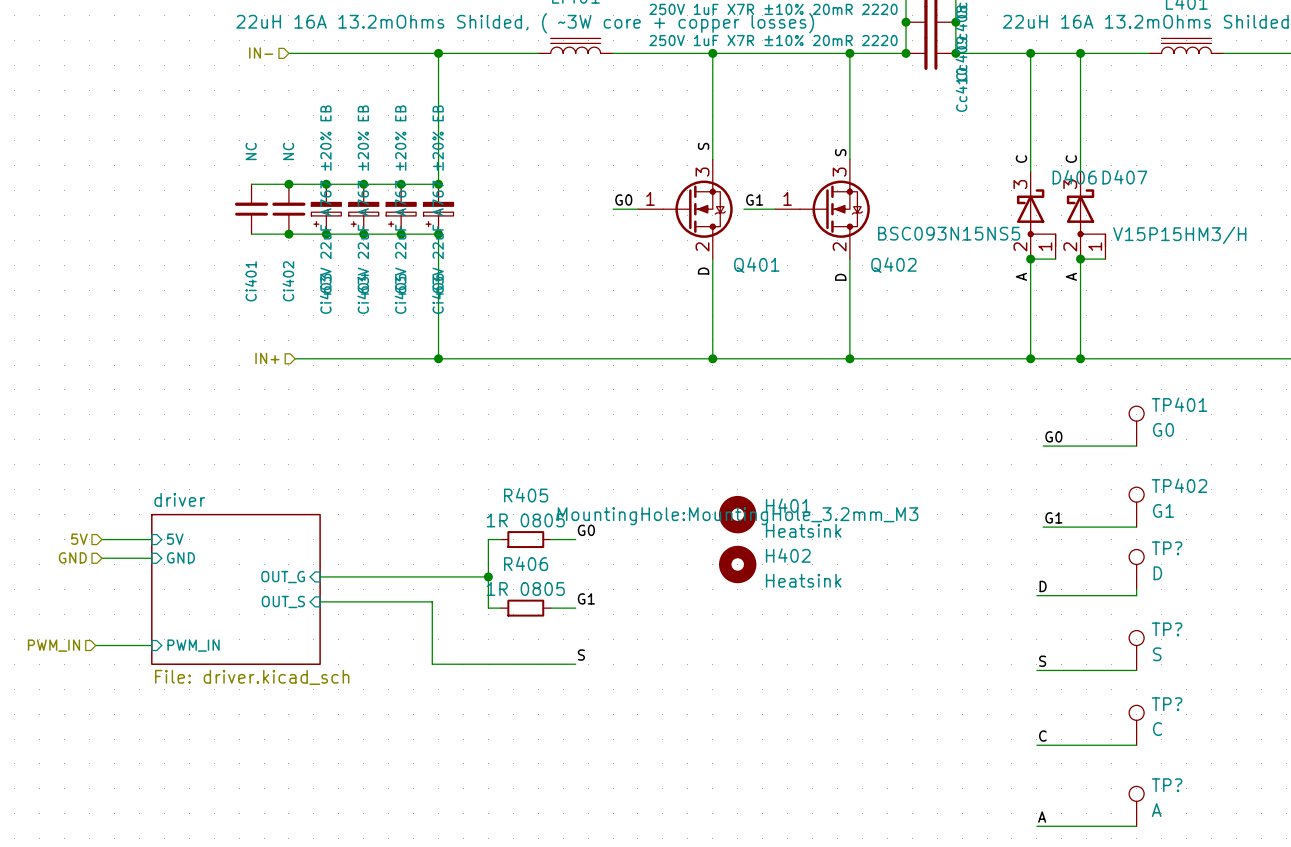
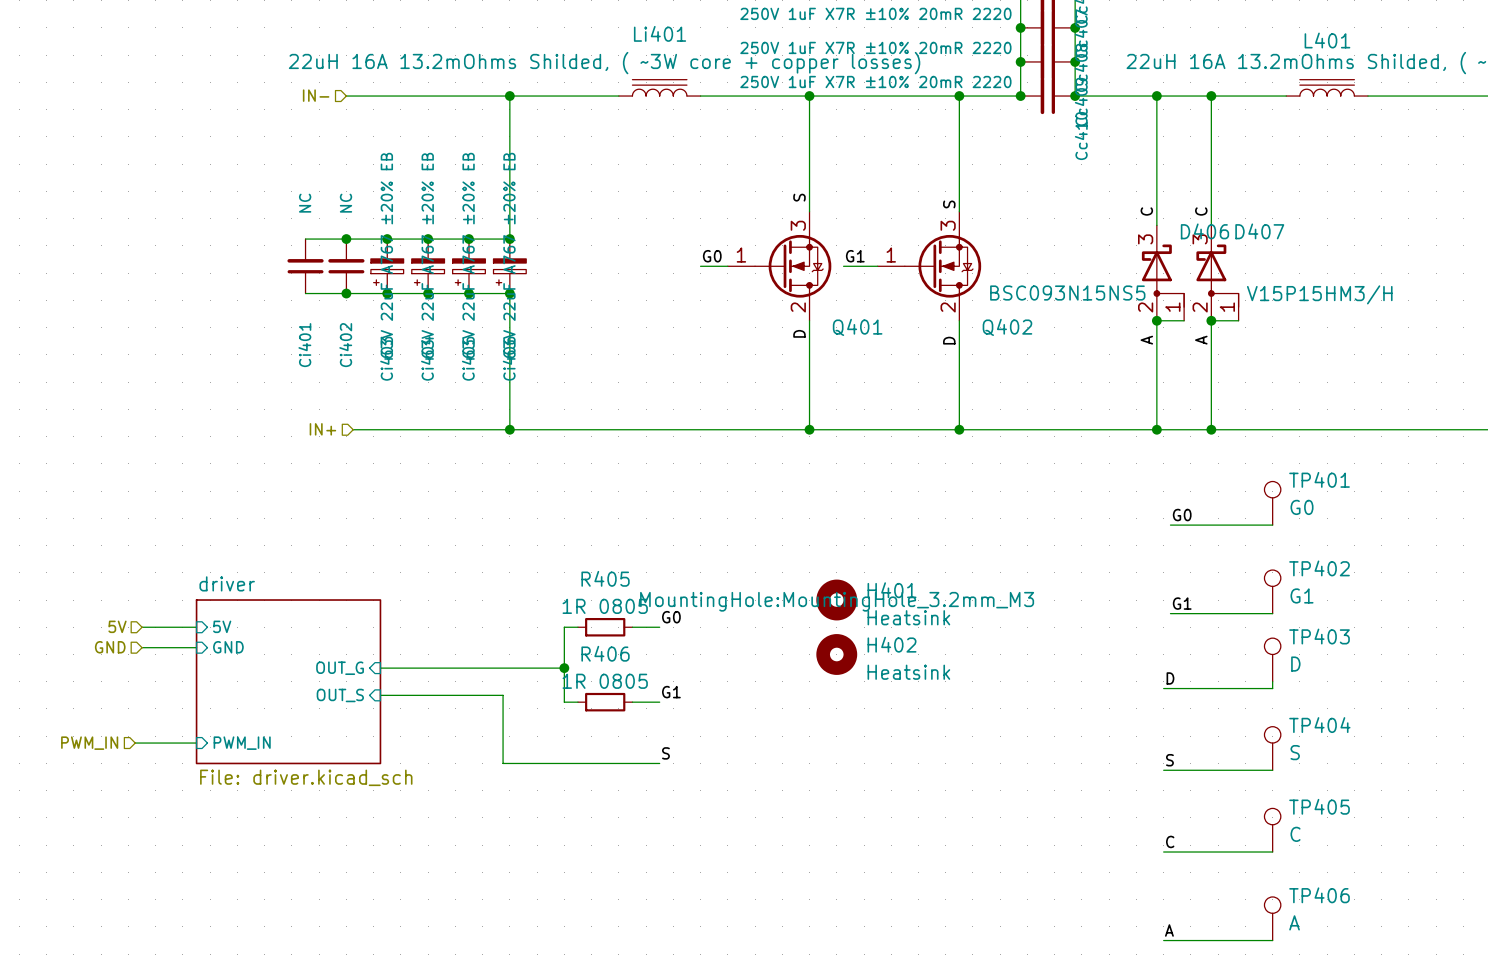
TP? name: TP? (1167, 548) -> TP403 (1319, 636)
TP? name: TP? (1167, 629) -> TP404 (1319, 725)
TP? name: TP? (1167, 704) -> TP405 (1319, 806)
TP? name: TP? (1167, 785) -> TP406 (1319, 895)

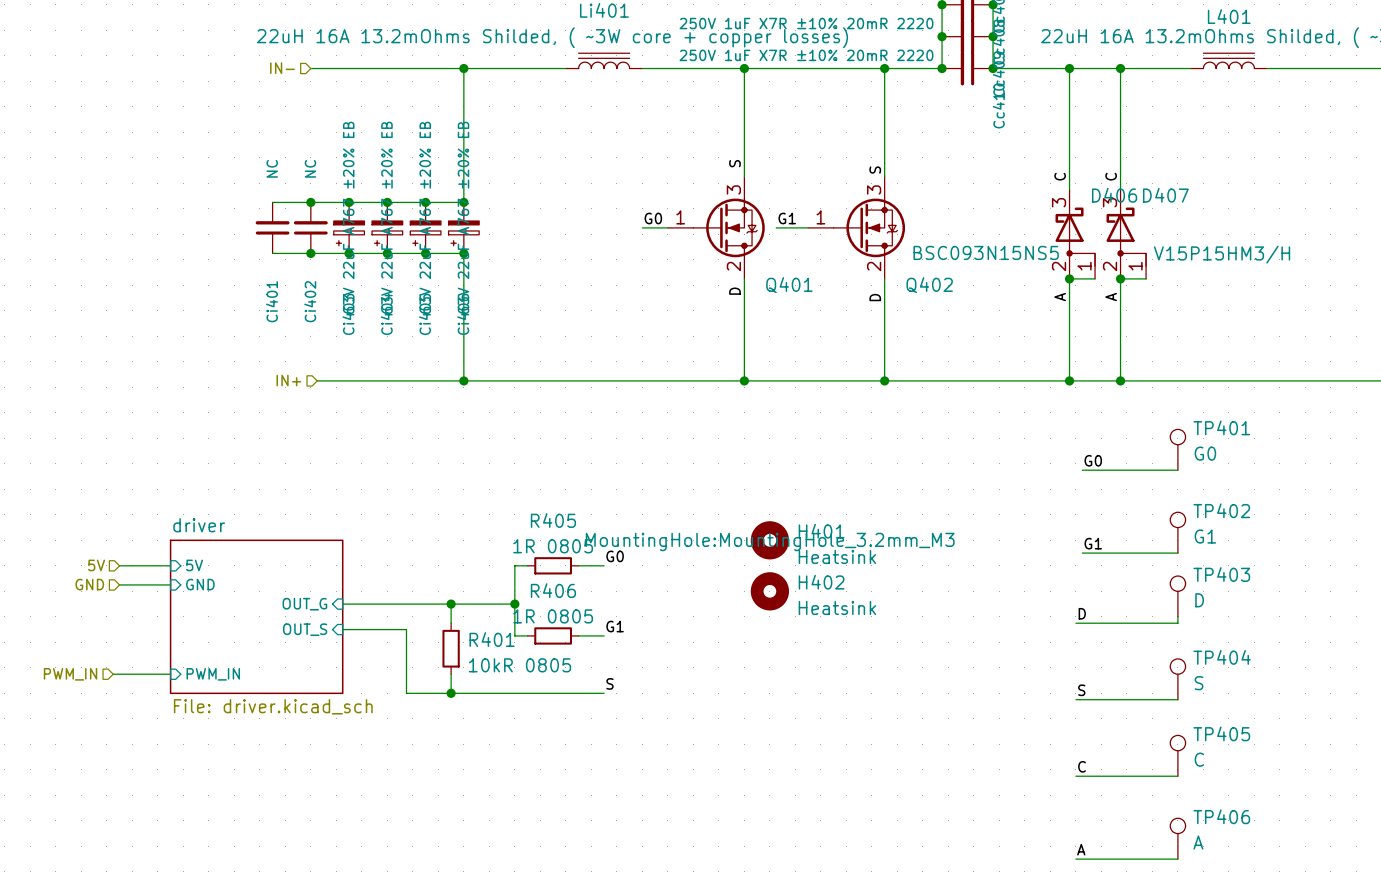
wire: none -> (451, 604) (451, 623)
junction: none -> (451, 604)
wire: (448, 695) (503, 695) (503, 763) -> (406, 629) (406, 693) (457, 693)
R401: none -> 10kR 0805 (451, 648)
wire: none -> (451, 674) (451, 693)
junction: none -> (451, 693)

